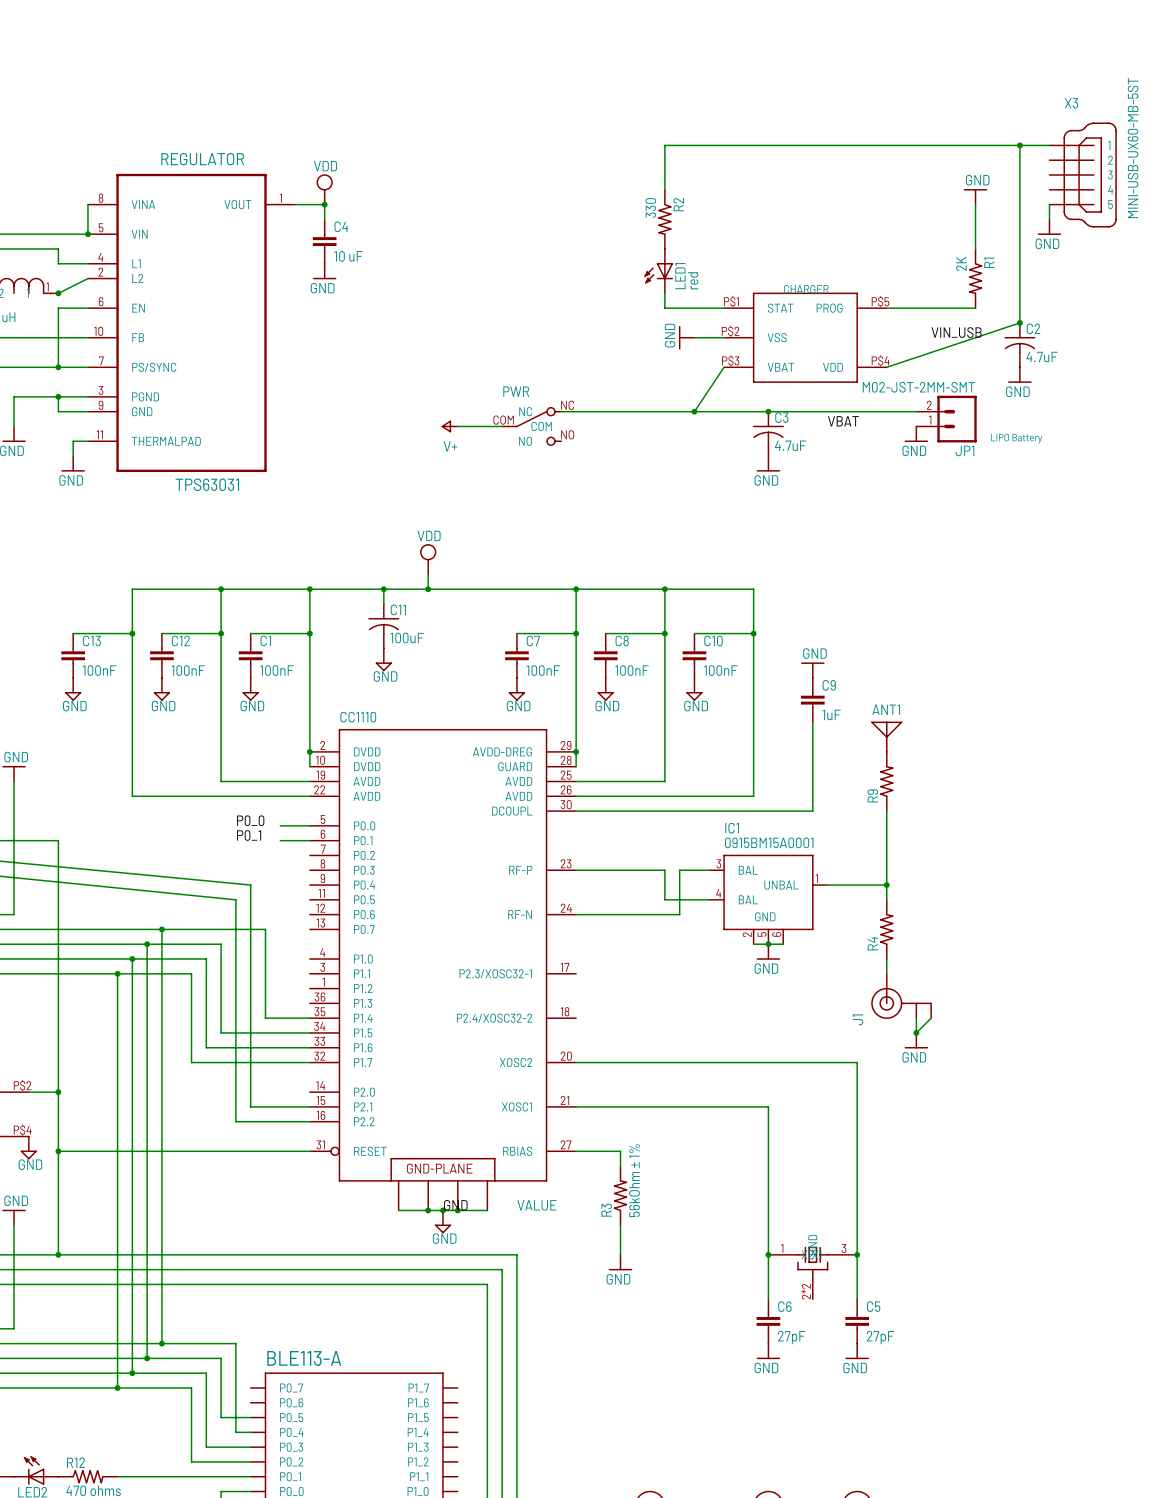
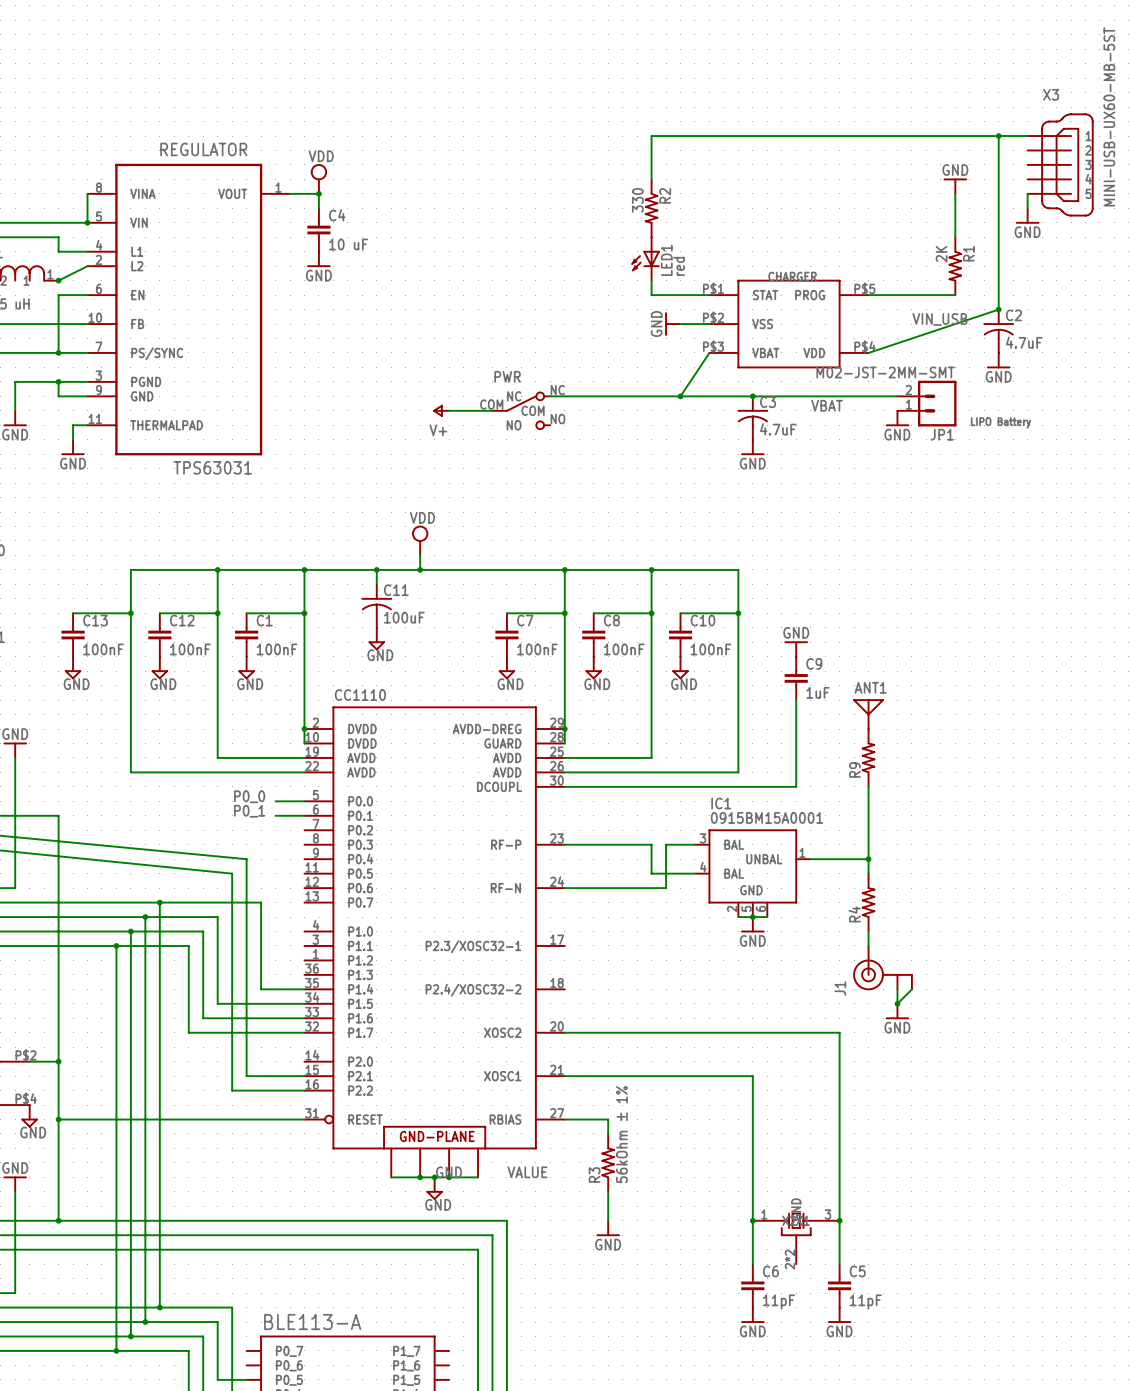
C6 value: 27pF (791, 1337) -> 11pF (778, 1302)
C5 value: 27pF (880, 1337) -> 11pF (865, 1302)

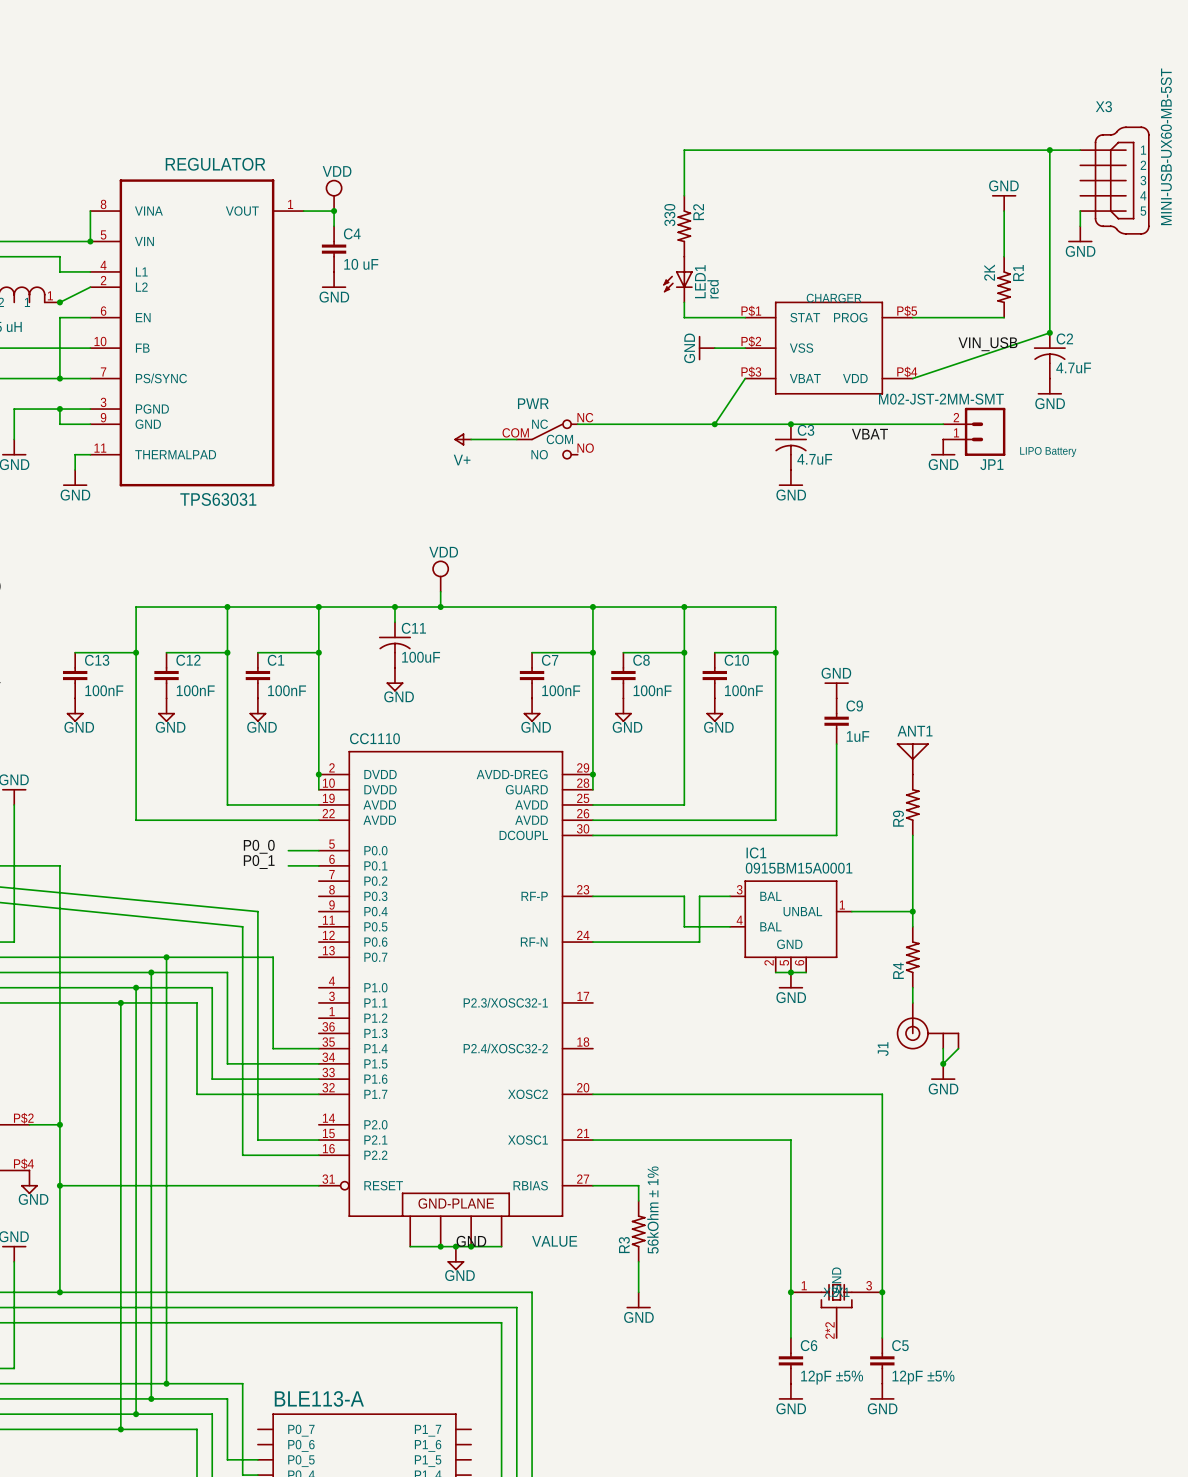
C6 value: 11pF (778, 1302) -> 12pF ±5% (832, 1377)
C5 value: 11pF (865, 1302) -> 12pF ±5% (923, 1377)

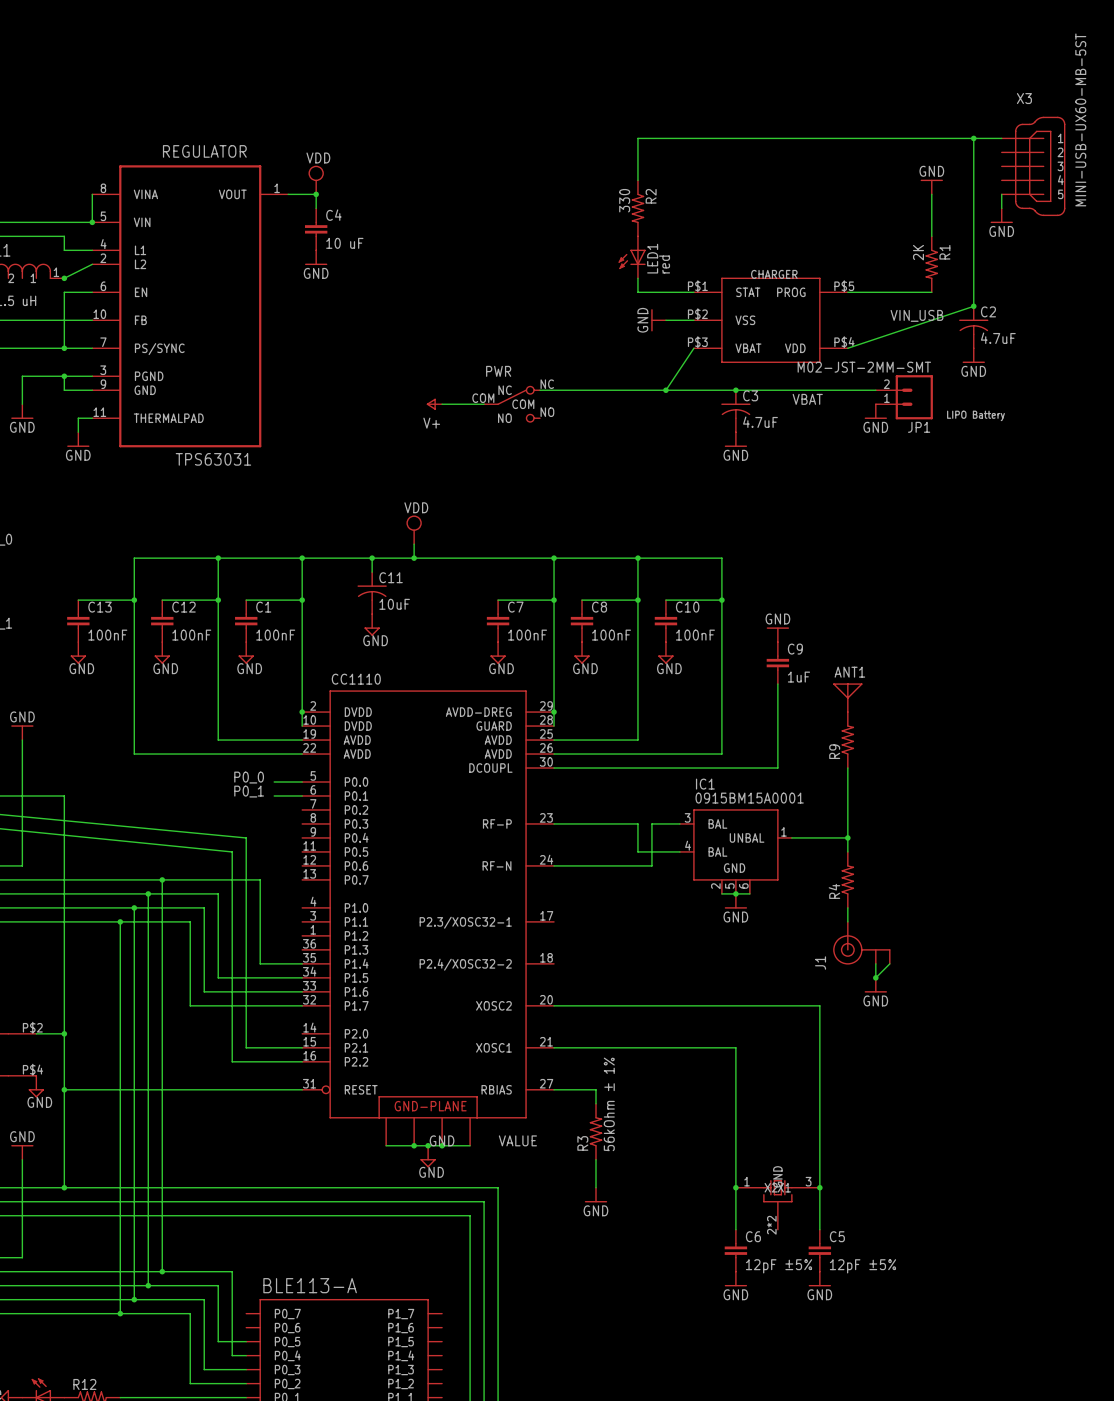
C11 value: 100uF (421, 657) -> 10uF (394, 604)

